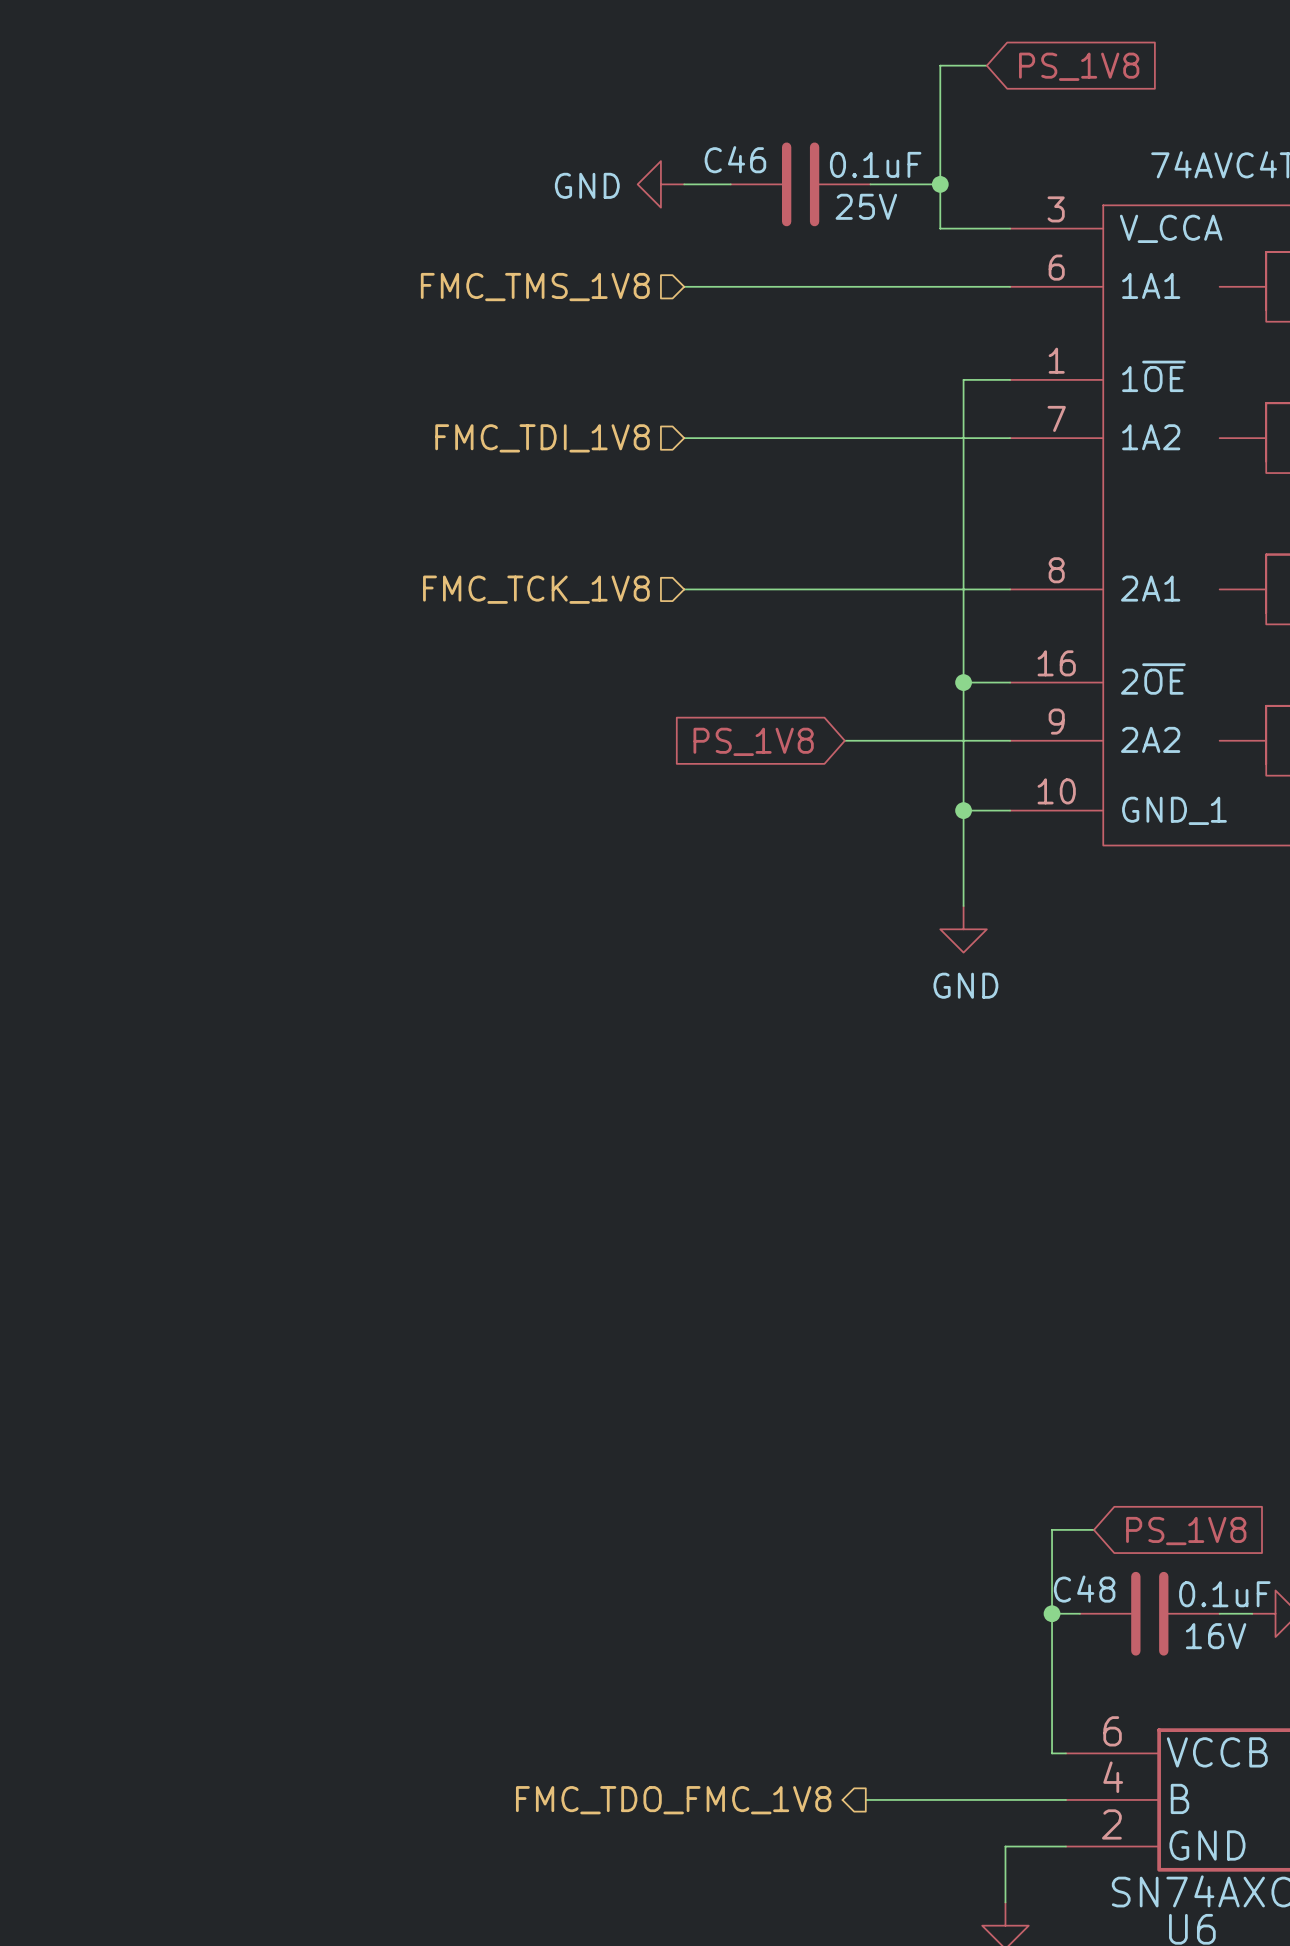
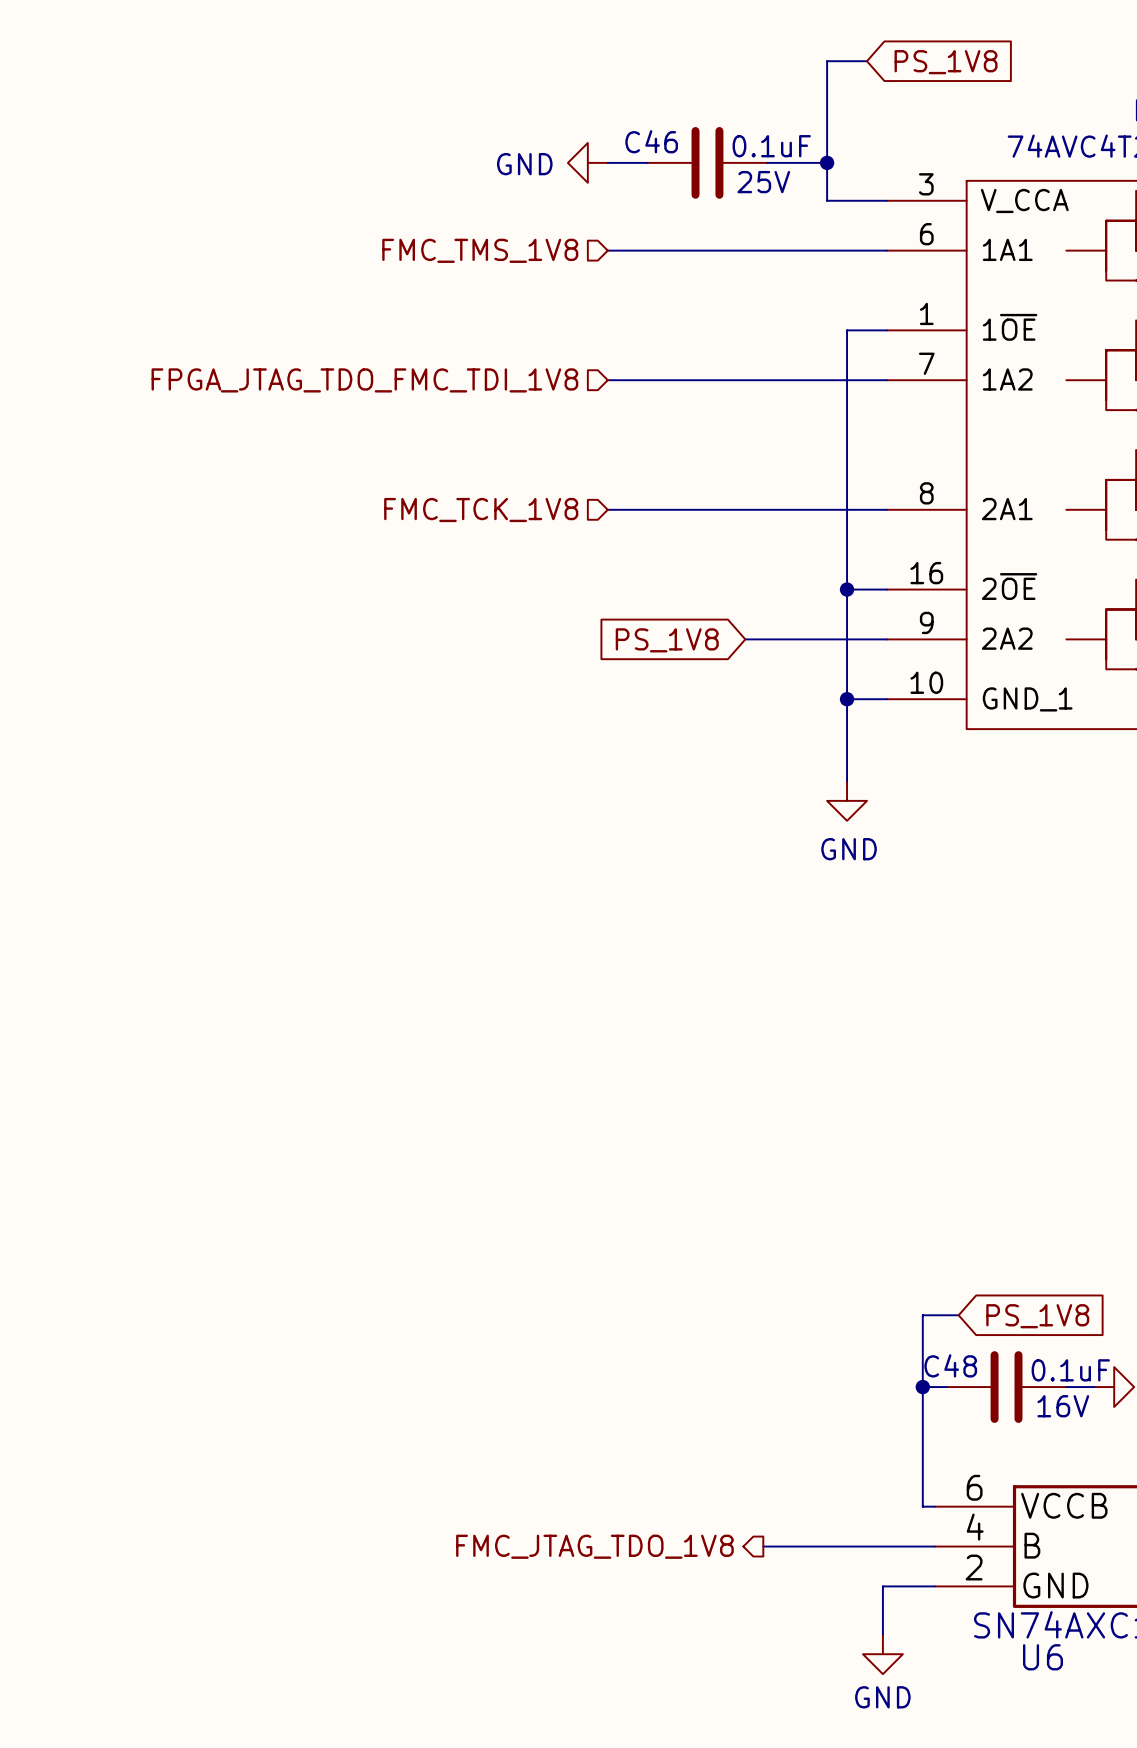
hierarchical label: FMC_TDI_1V8 (542, 438) -> FPGA_JTAG_TDO_FMC_TDI_1V8 (364, 380)
hierarchical label: FMC_TDO_FMC_1V8 (673, 1800) -> FMC_JTAG_TDO_1V8 (594, 1546)

